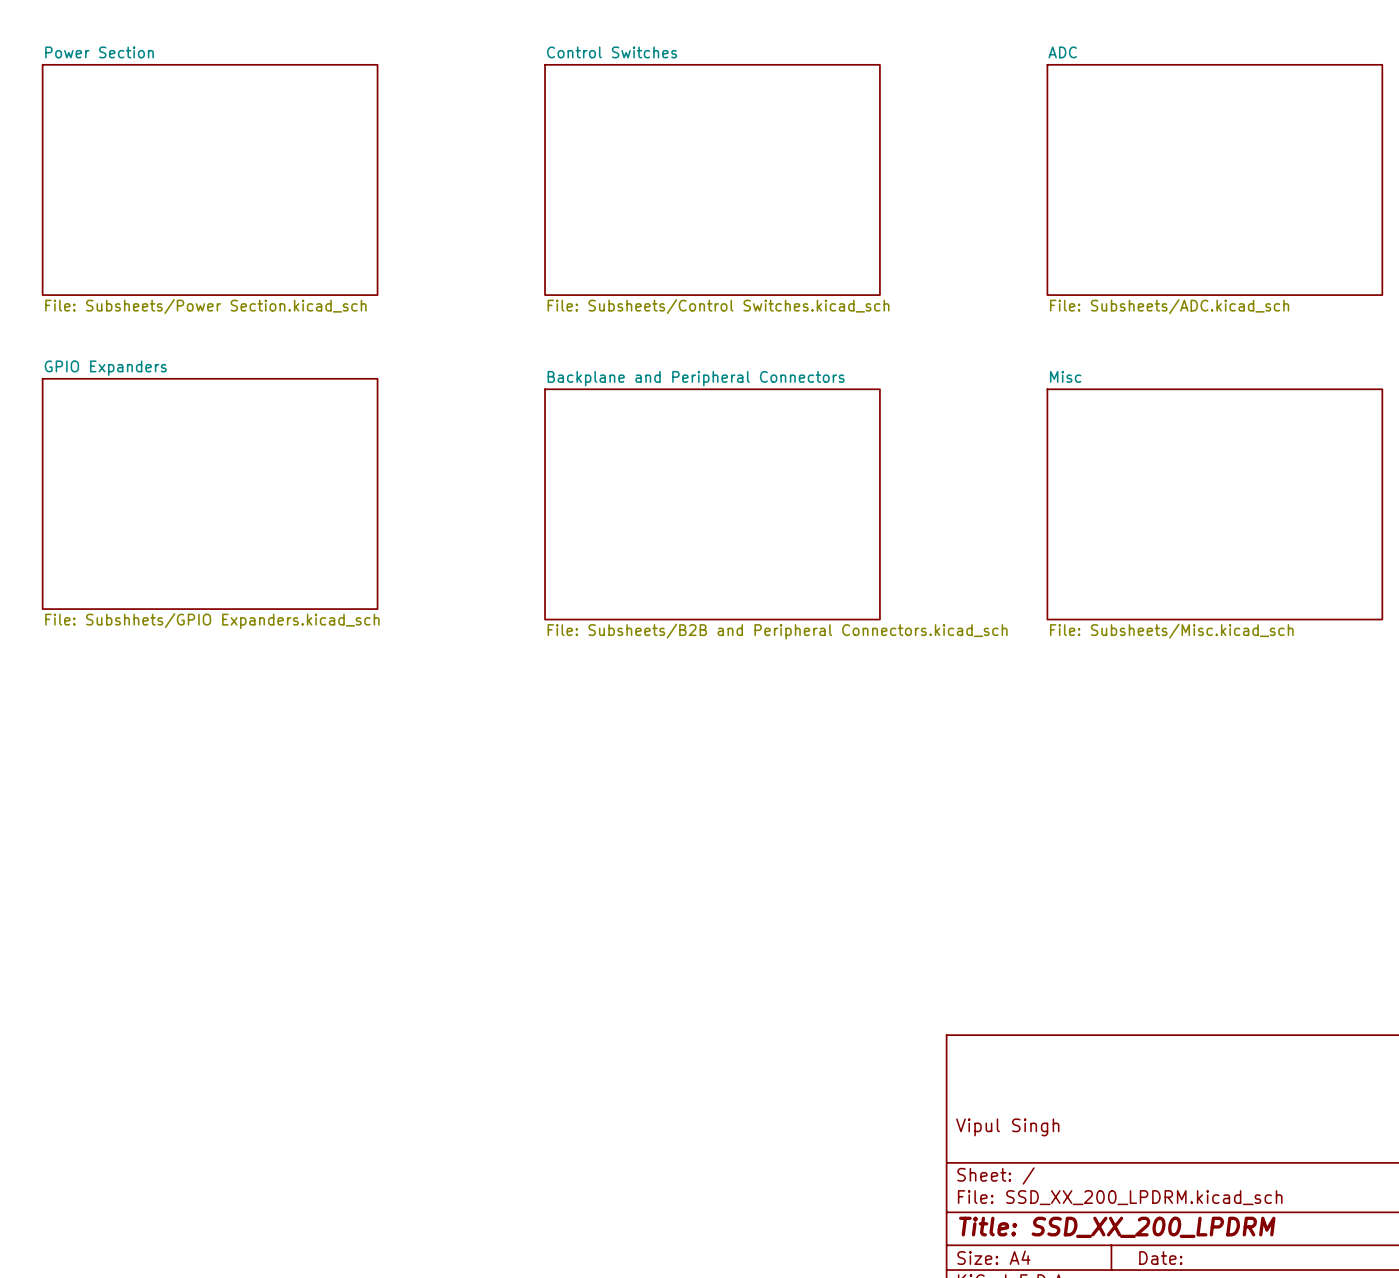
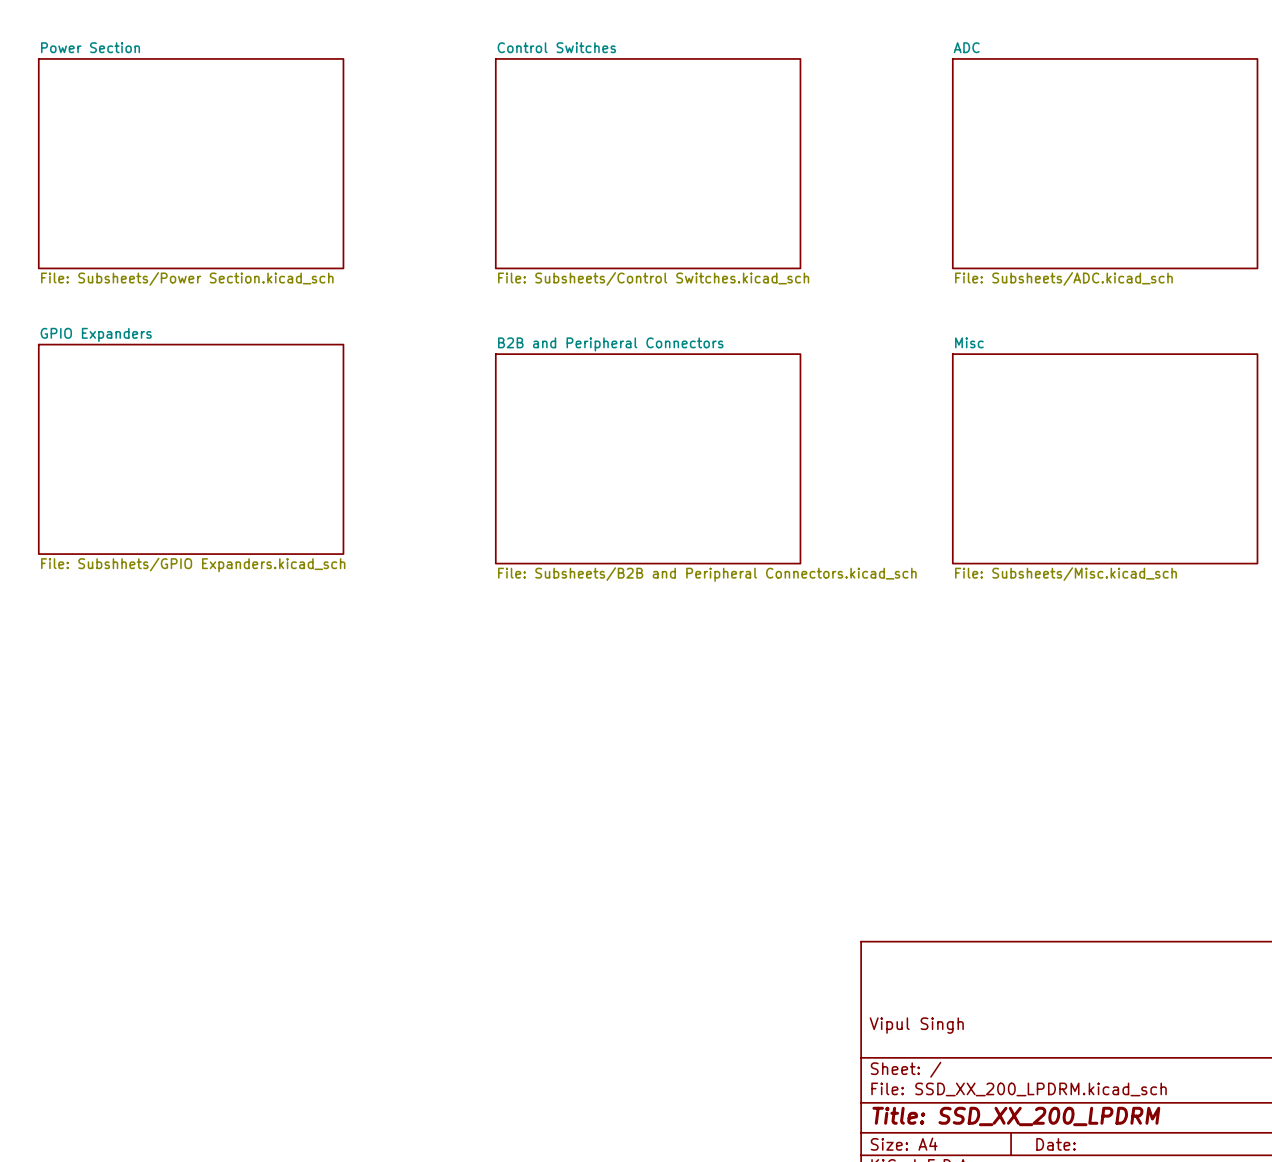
sheet B2B and Peripheral Connectors name: Backplane and Peripheral Connectors (696, 378) -> B2B and Peripheral Connectors (610, 344)

